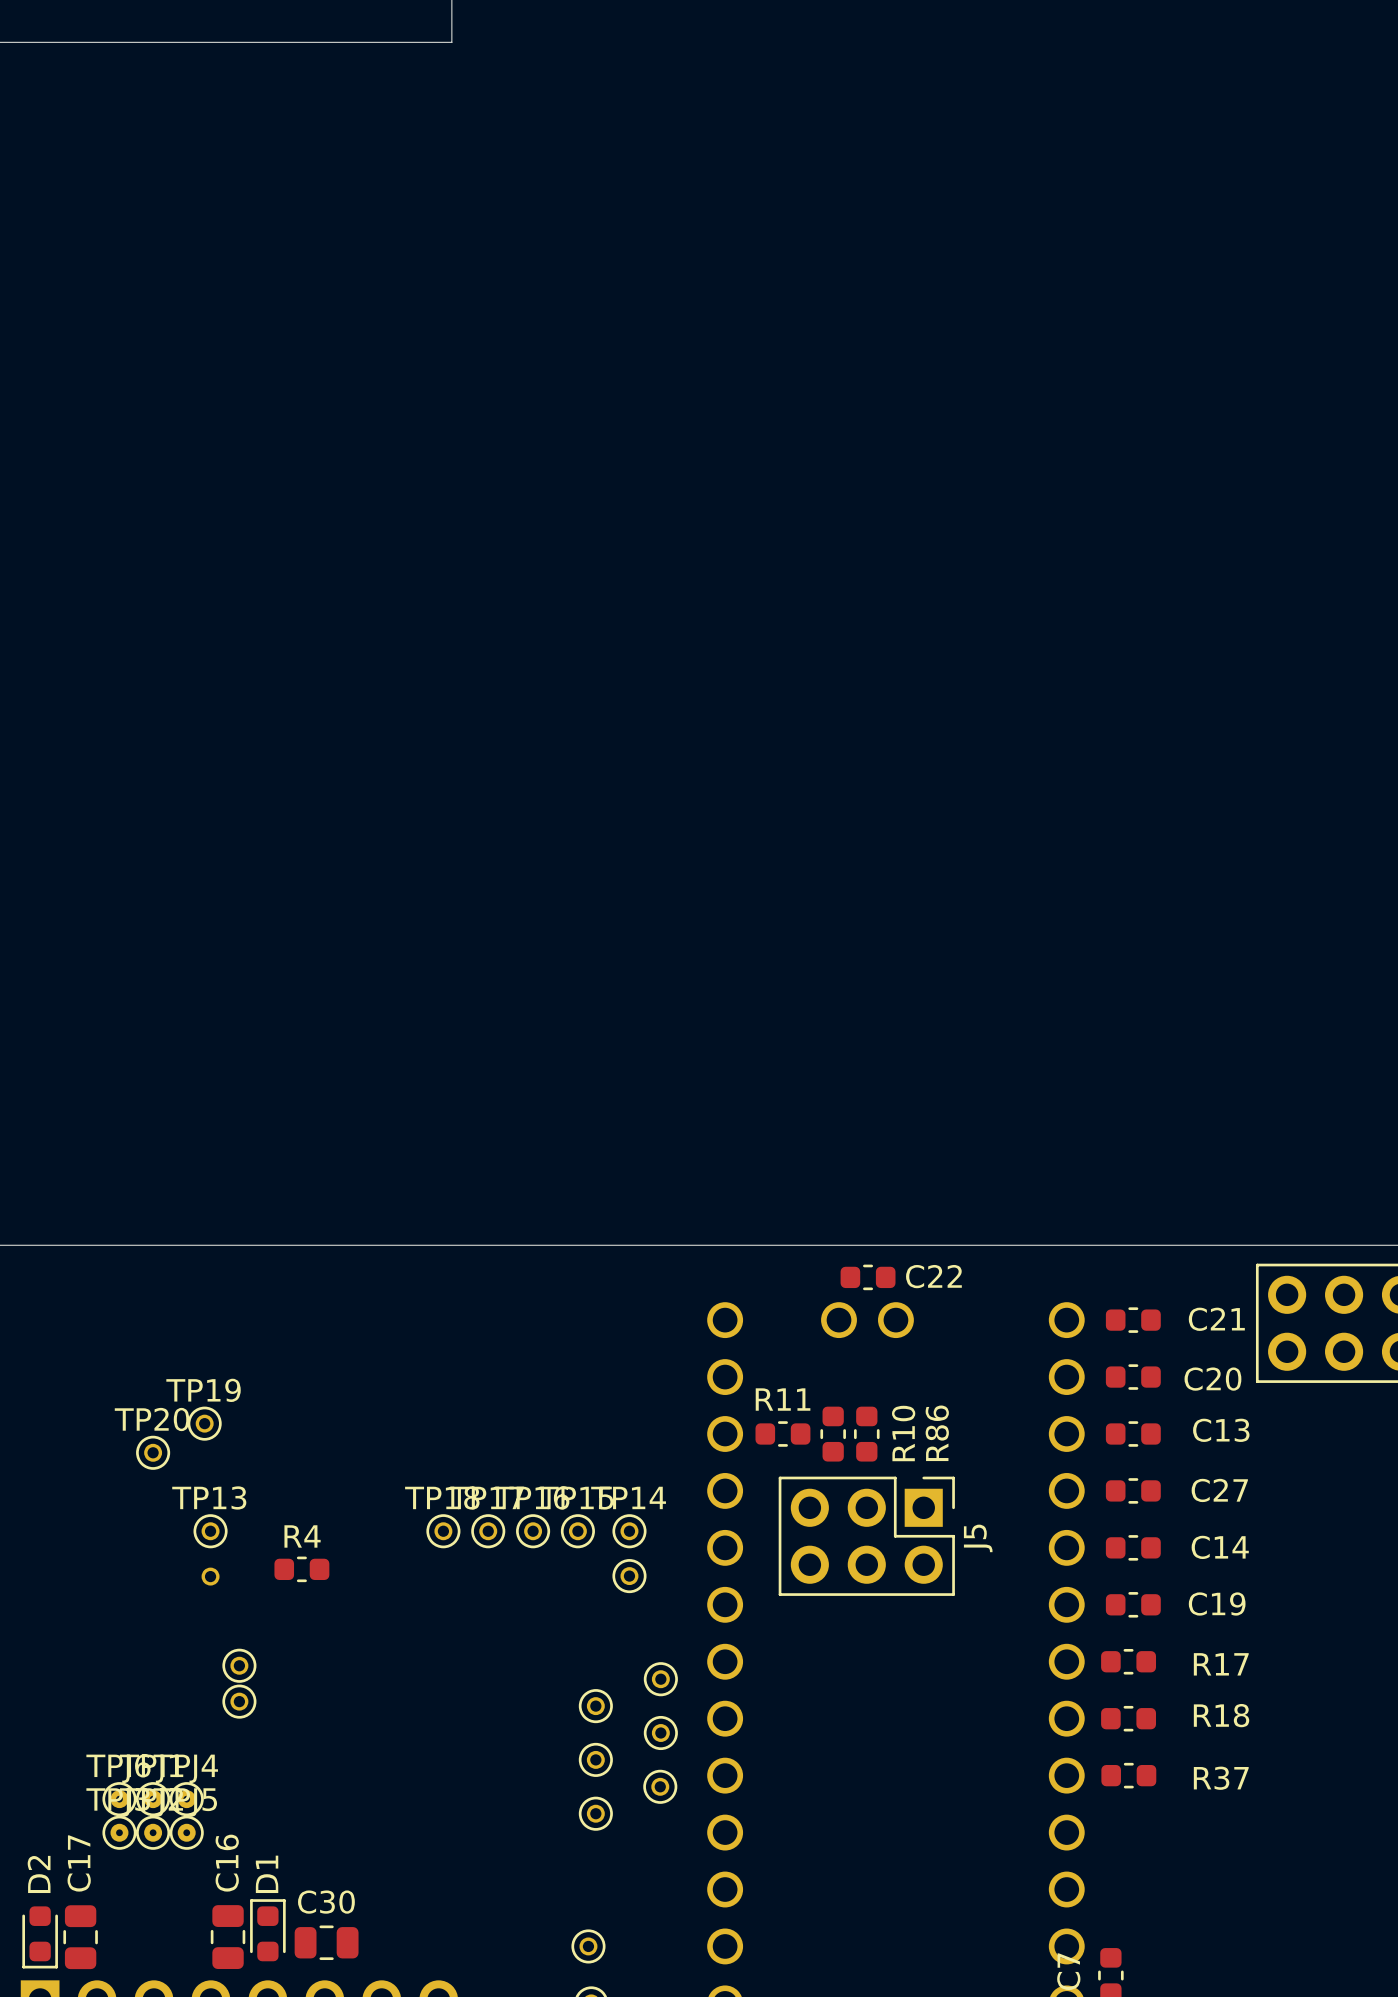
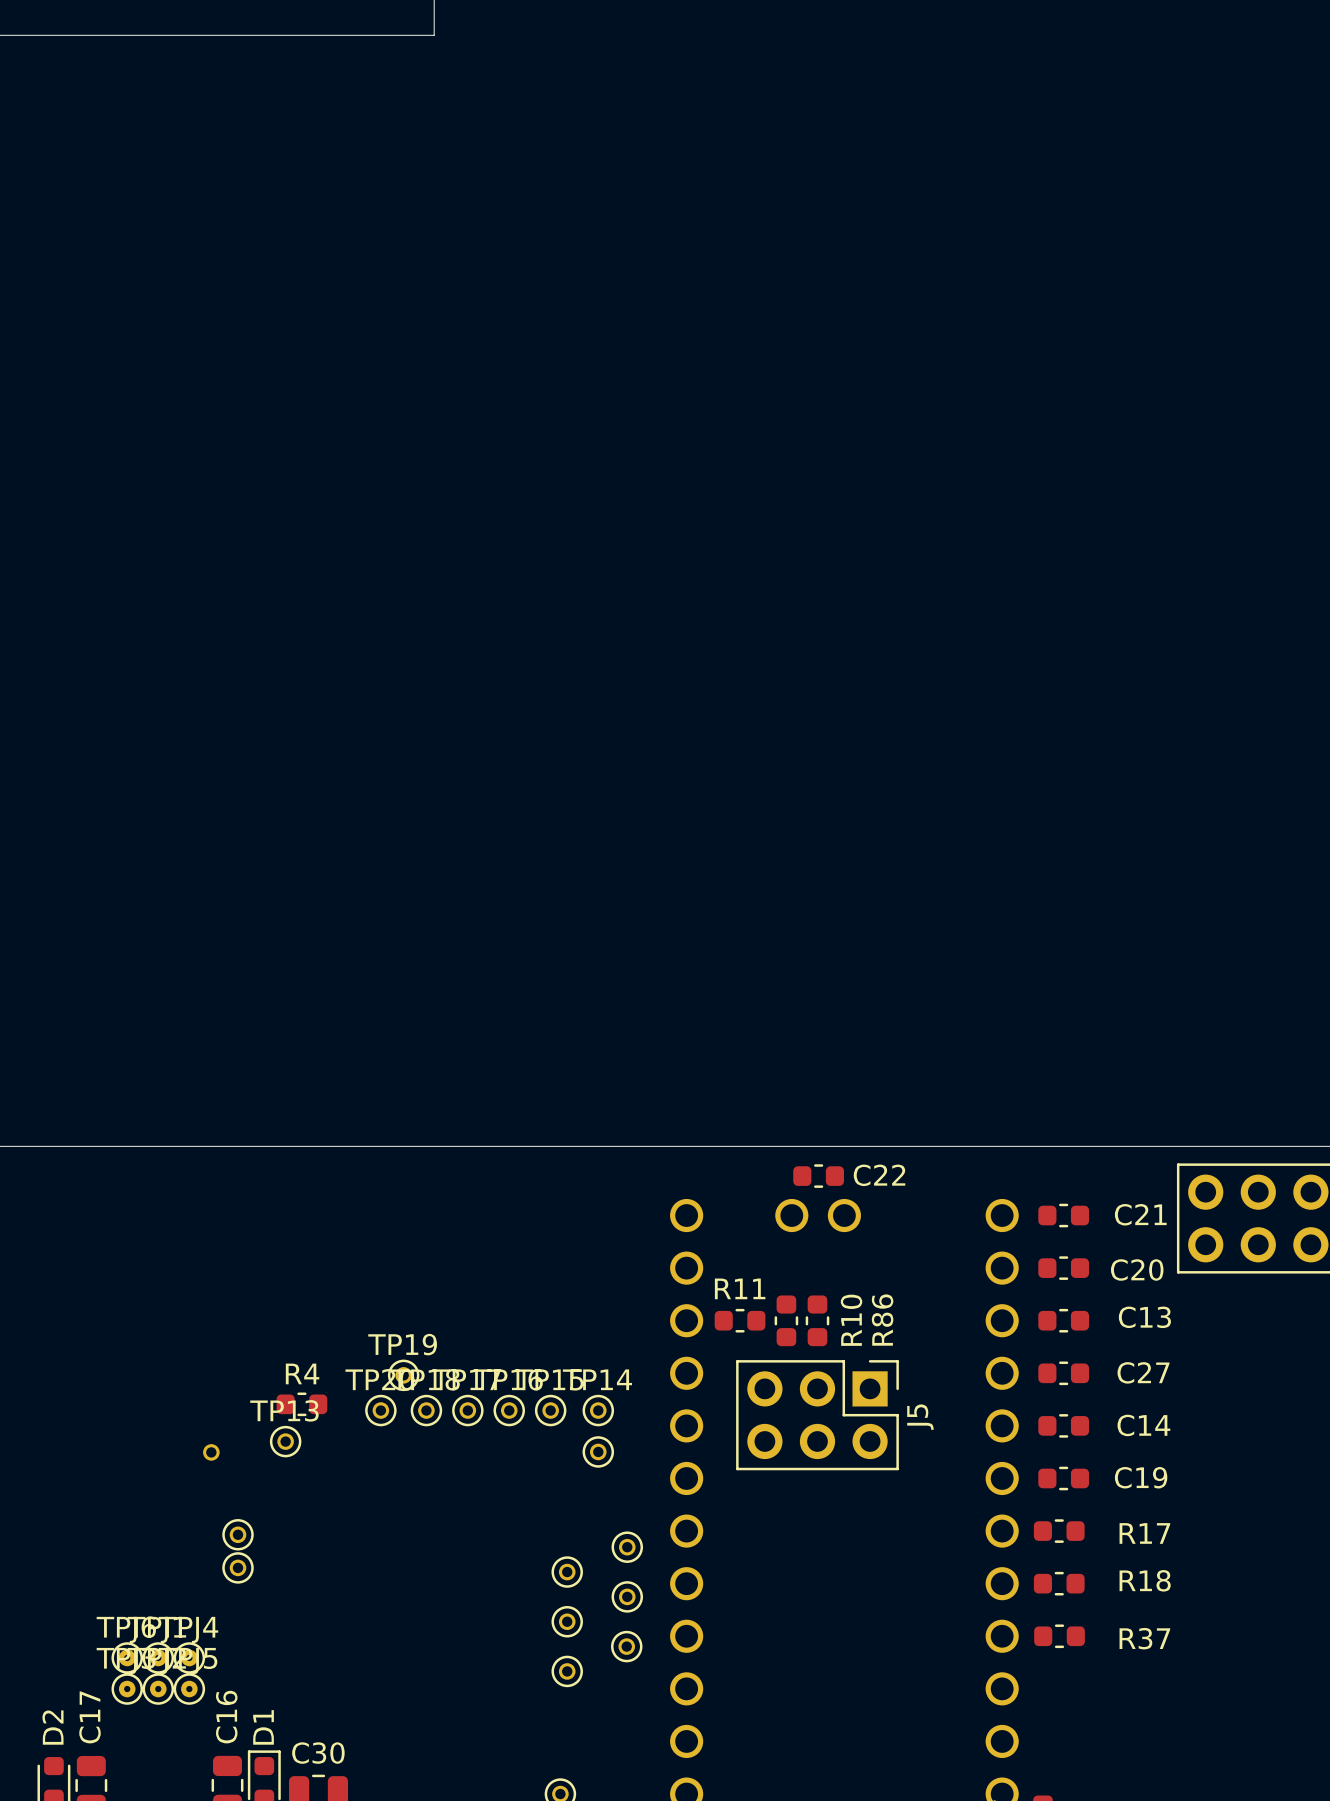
TP19 position: (204, 1423) -> (403, 1375)
TP20 position: (153, 1452) -> (380, 1410)
TP13 position: (210, 1531) -> (285, 1441)
R4 position: (301, 1569) -> (301, 1404)

